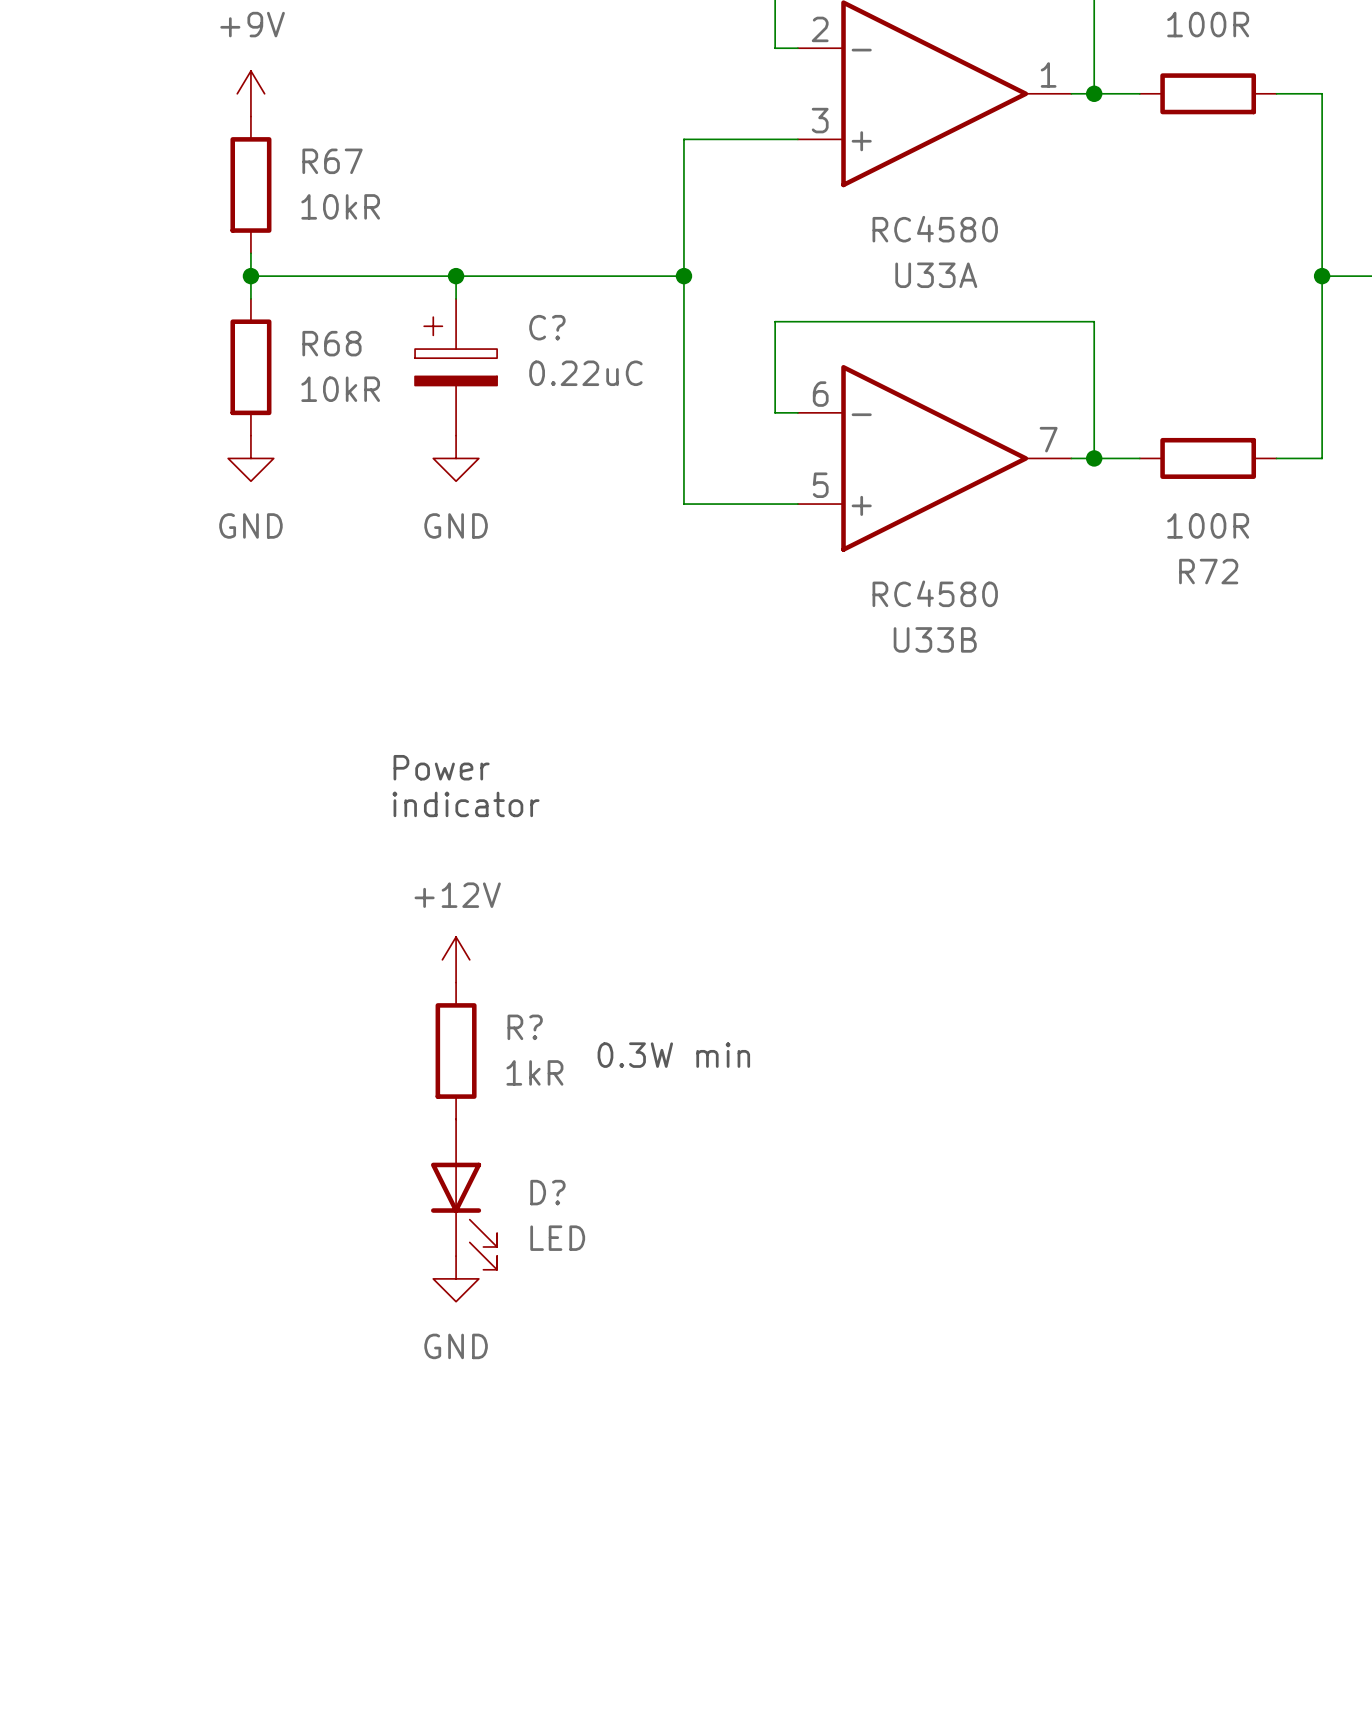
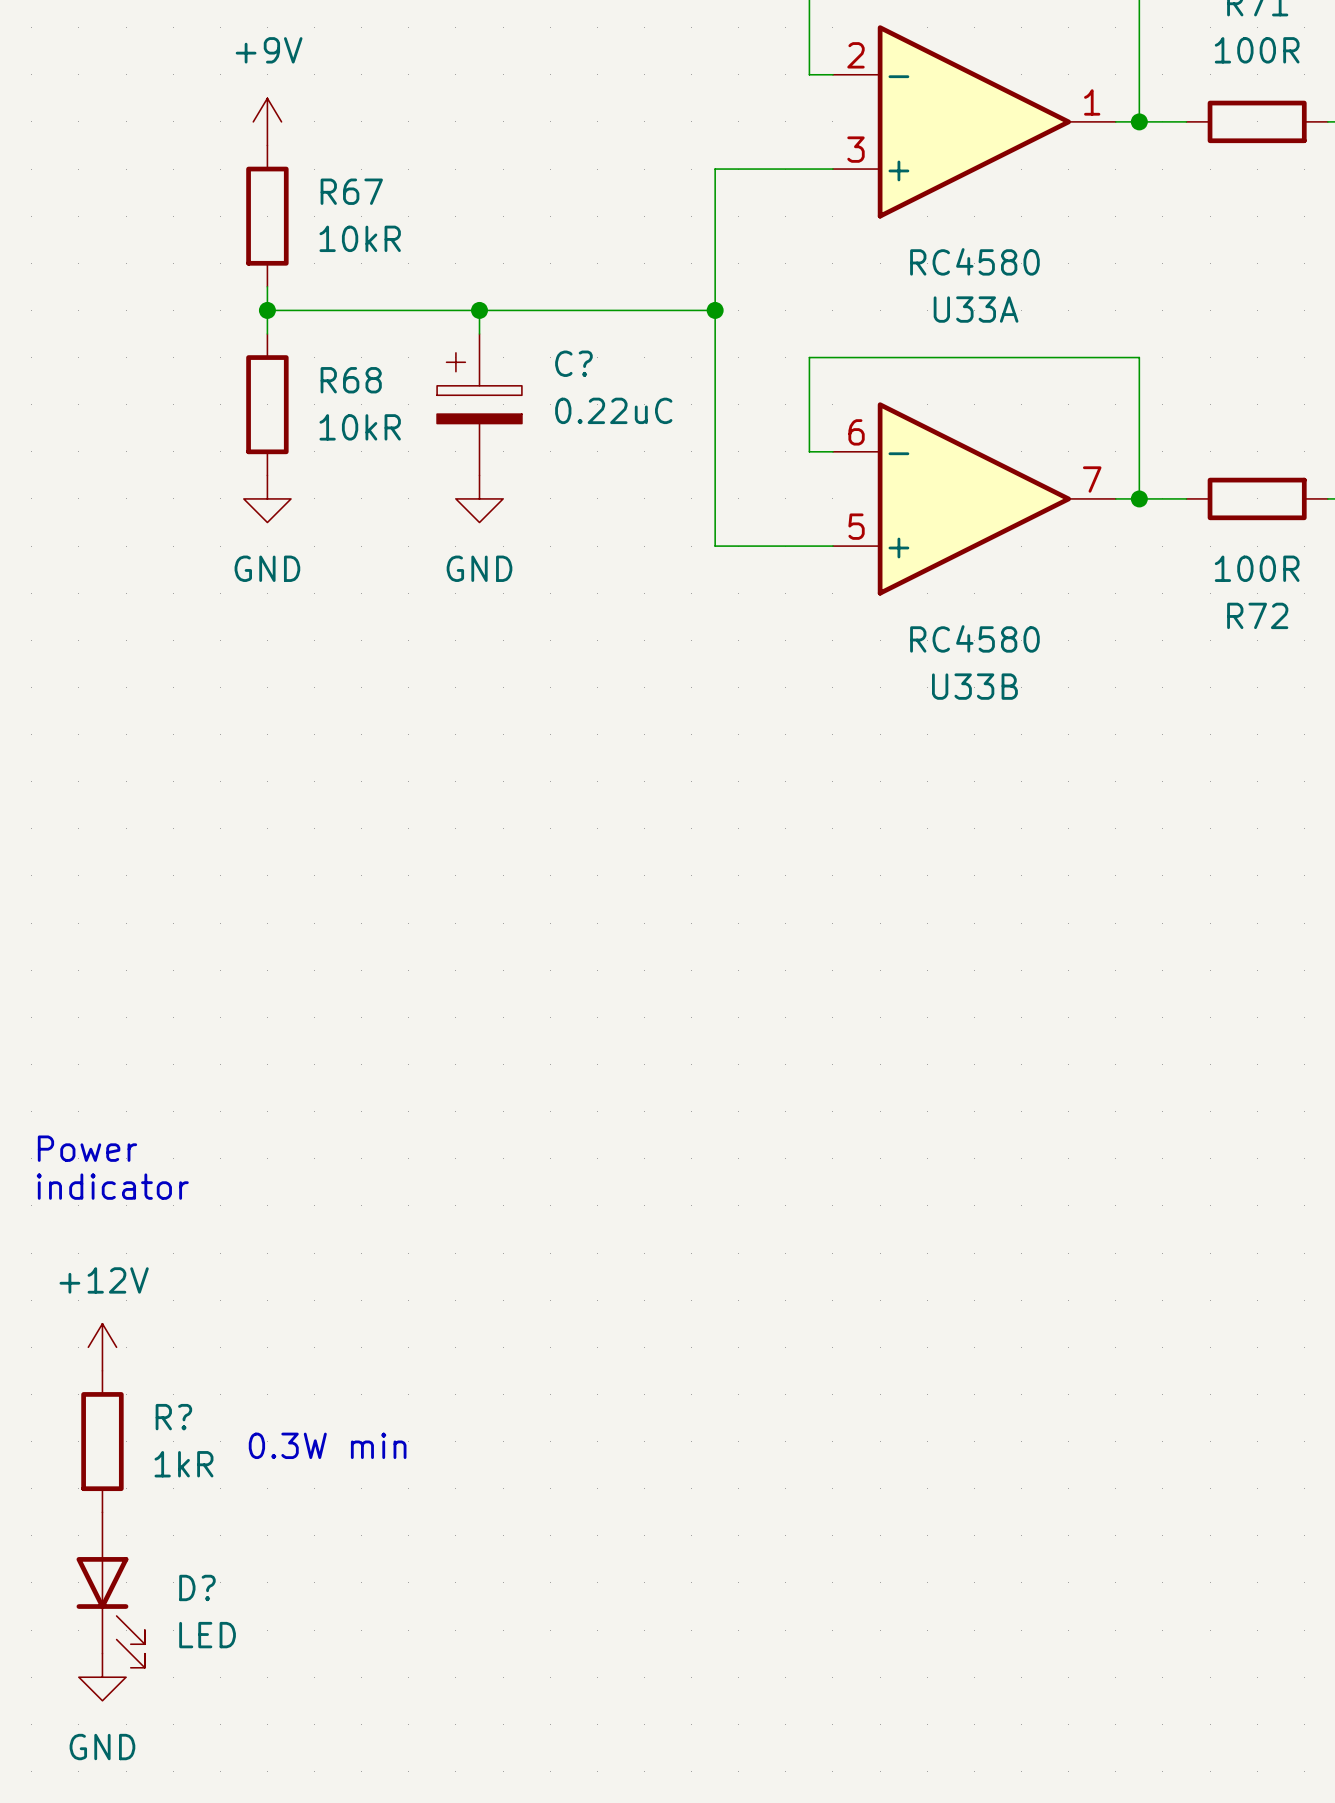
text: Power (441, 767) -> none
text: indicator (466, 804) -> none
power symbol: +12V (456, 959) -> none
R?: 1kR (456, 1051) -> none
text: 0.3W min (673, 1055) -> none
text: none -> Power (87, 1148)
text: none -> indicator (112, 1186)
D?: LED (464, 1194) -> none
power symbol: none -> +12V (102, 1347)
power symbol: GND (456, 1278) -> none
R?: none -> 1kR (102, 1441)
text: none -> 0.3W min (327, 1445)
D?: none -> LED (110, 1590)
power symbol: none -> GND (102, 1677)

